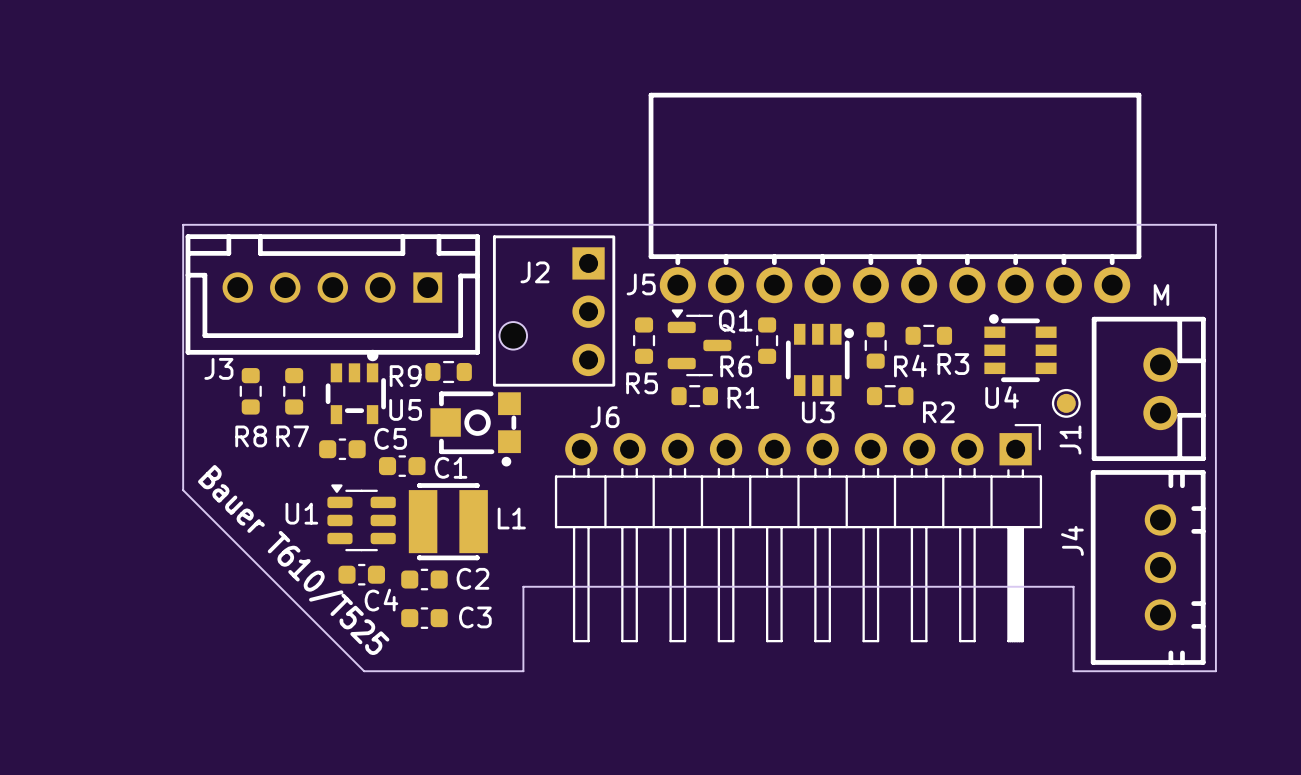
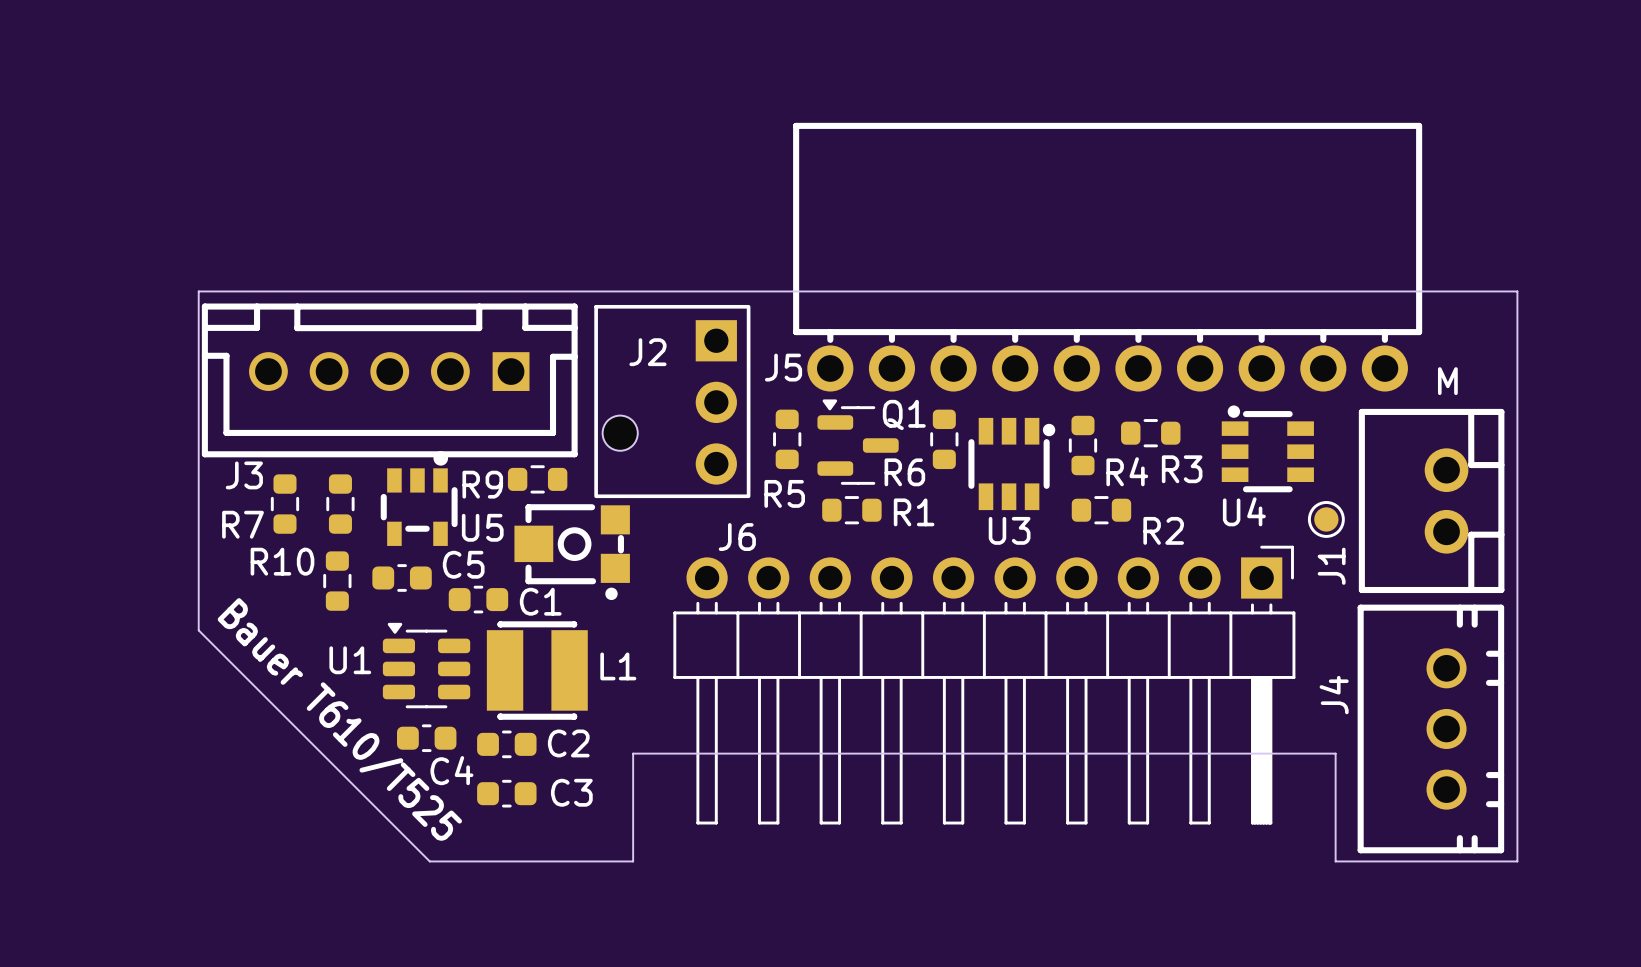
R8 name: R8 (251, 436) -> R7 (243, 524)
R7 name: R7 (292, 436) -> none
R10: none -> (337, 581)

